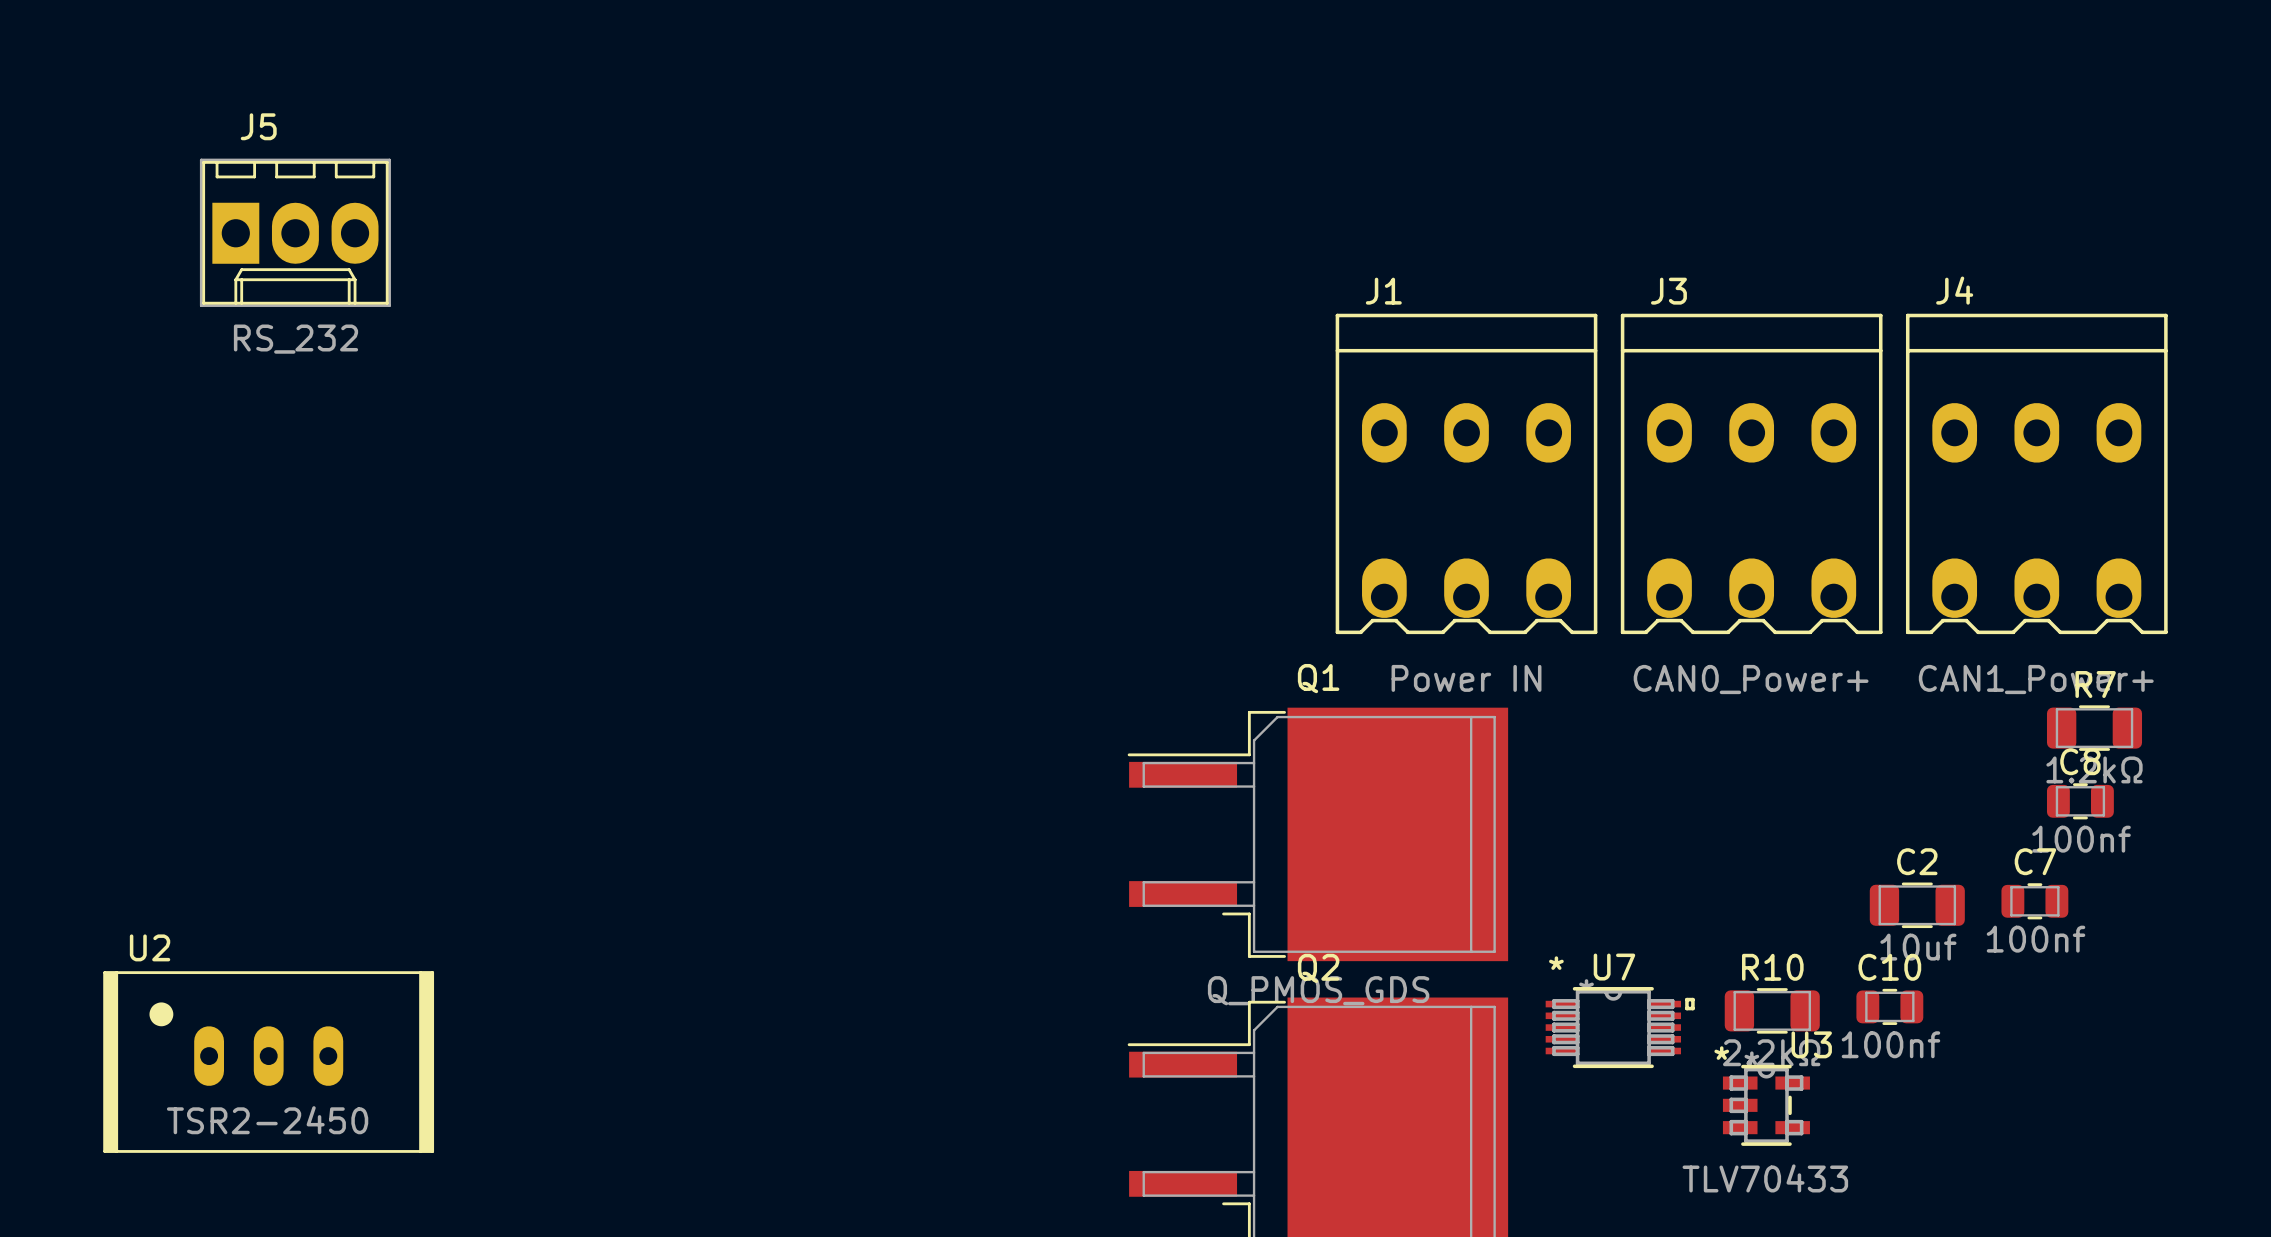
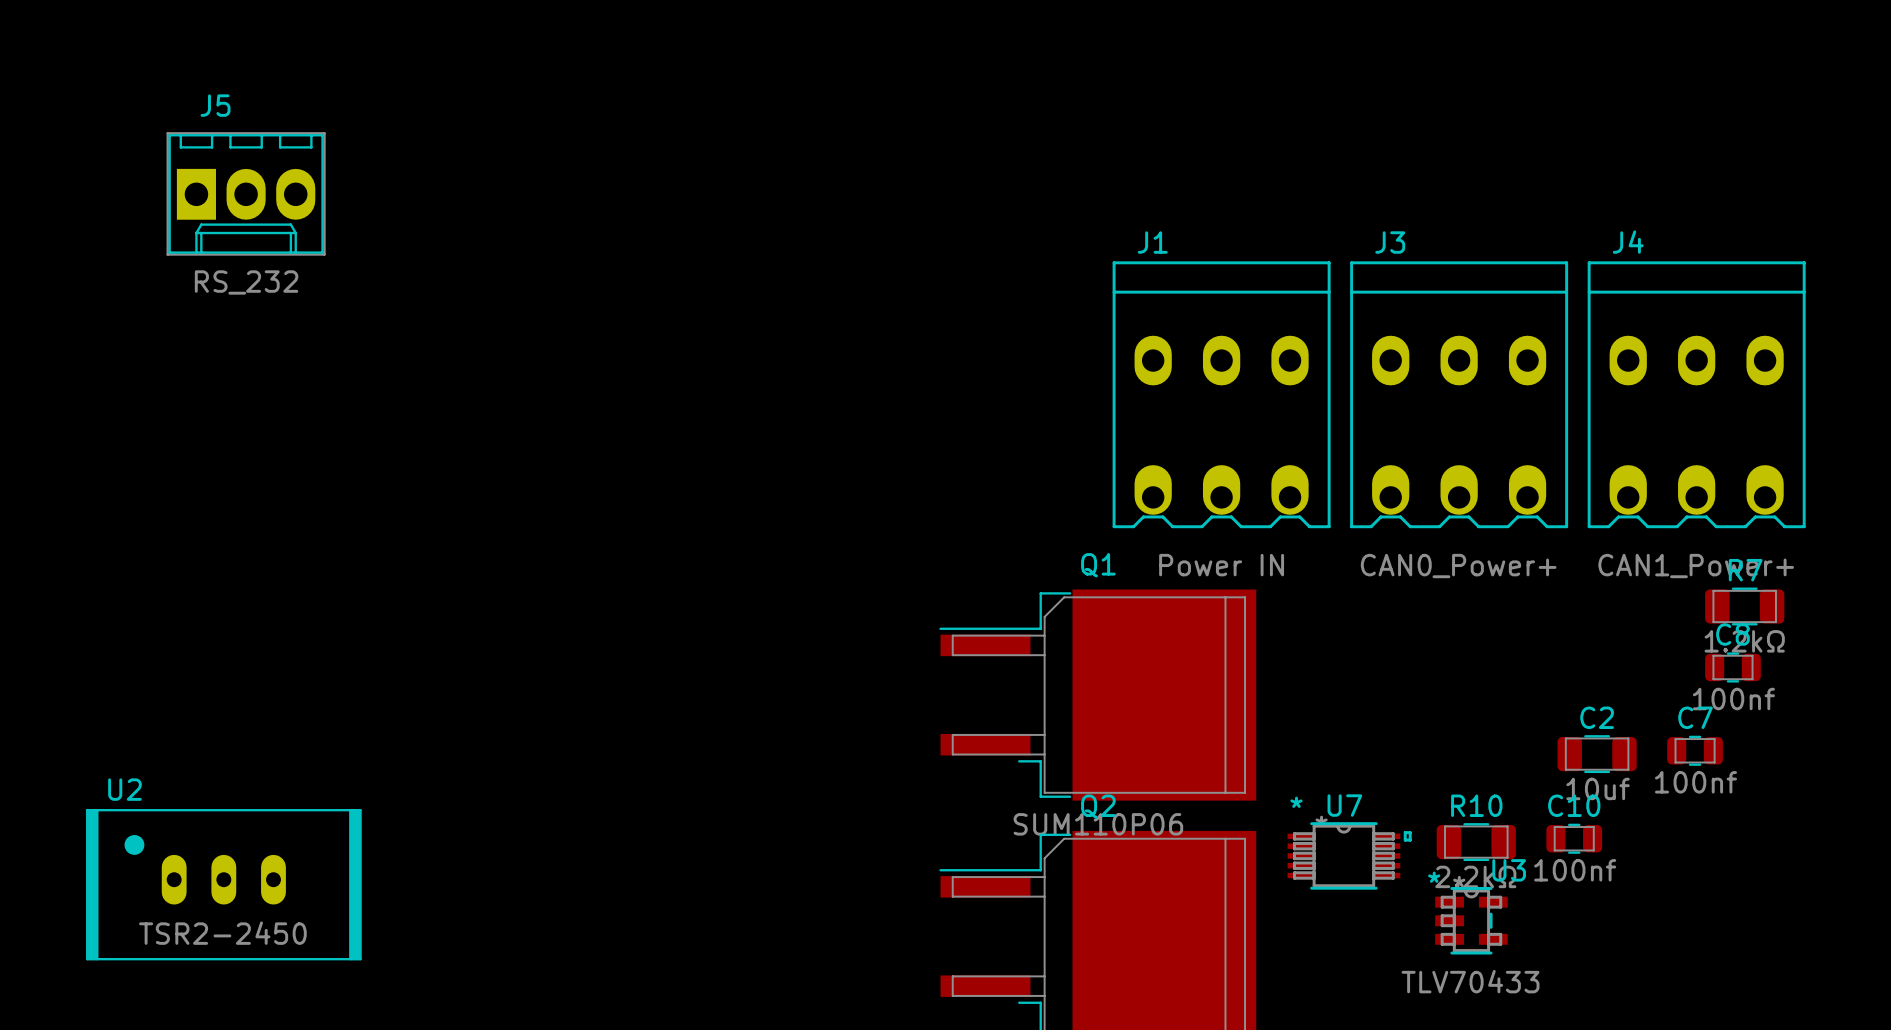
Q1 value: Q_PMOS_GDS (1318, 990) -> SUM110P06 (1098, 824)

